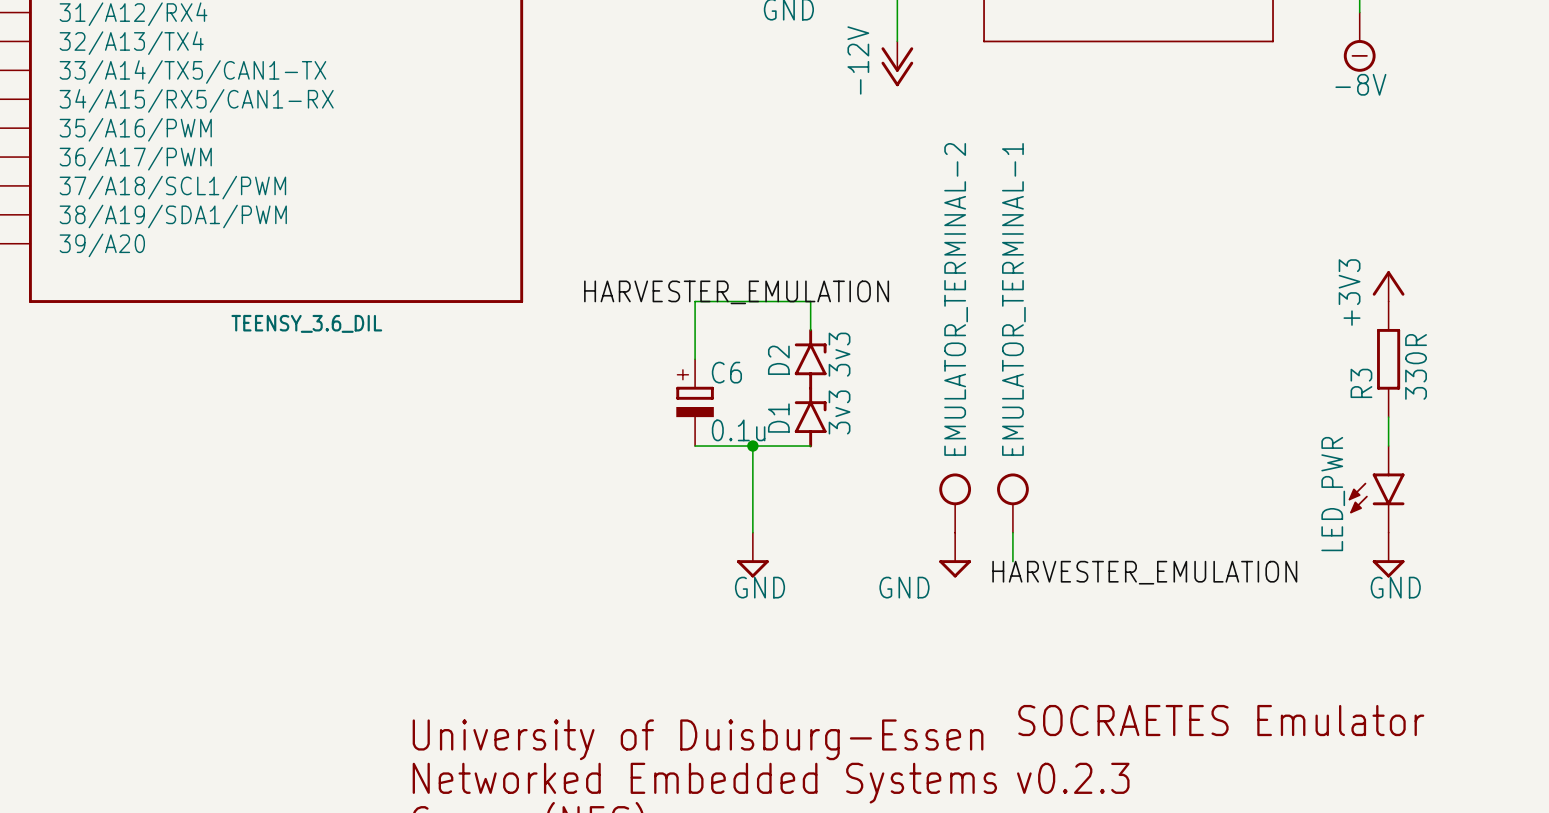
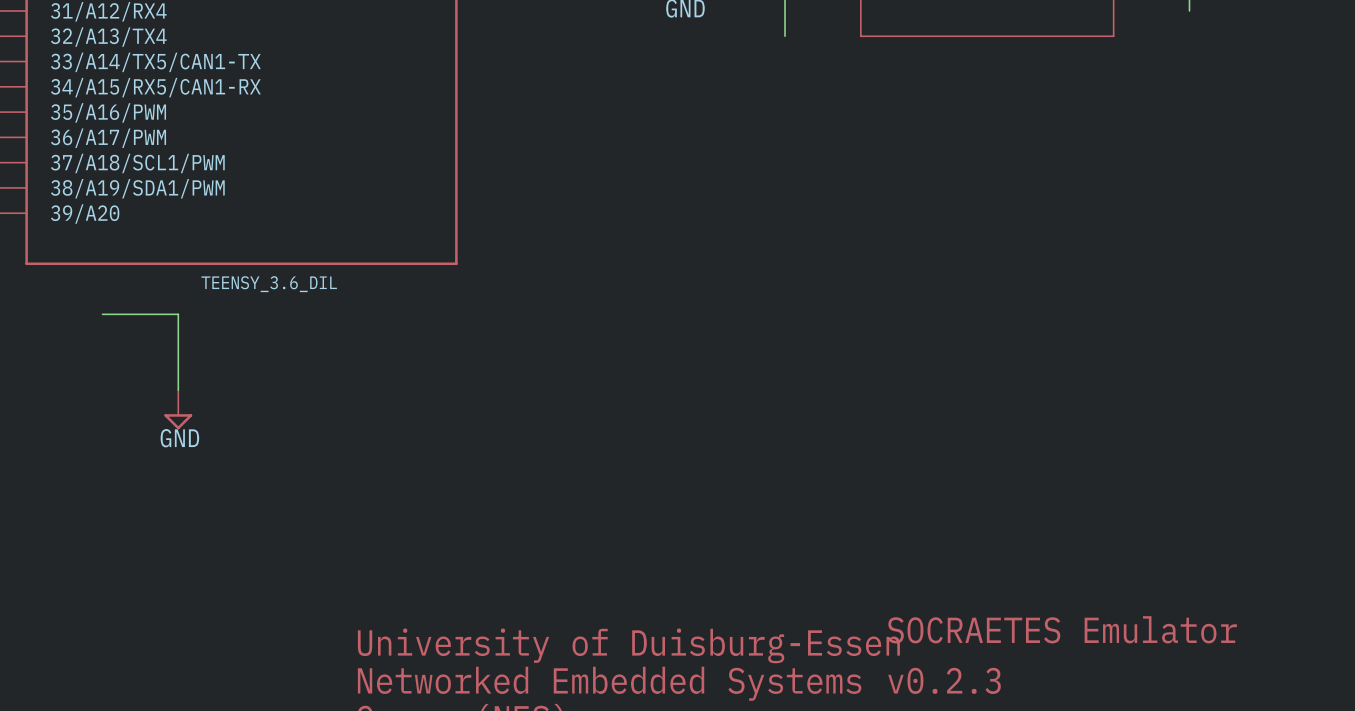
power symbol: -8V (1359, 42) -> none
power symbol: -12V (897, 63) -> none
power symbol: +3V3 (1388, 286) -> none
label: HARVESTER_EMULATION (736, 292) -> none
wire: (810, 330) (810, 301) (695, 301) (695, 359) -> none
wire: none -> (102, 314) (178, 314) (178, 390)
D2: 3v3 (810, 359) -> none
R3: 330R (1388, 359) -> none
C6: 0.1u (695, 402) -> none
D1: 3v3 (810, 417) -> none
wire: (1388, 417) (1388, 446) -> none
wire: (695, 446) (810, 446) -> none
wire: (752, 446) (752, 532) -> none
junction: (752, 446) -> none
power symbol: none -> GND (178, 409)
LED_PWR: (1376, 489) -> none
EMULATOR_TERMINAL-2: (955, 503) -> none
EMULATOR_TERMINAL-1: (1012, 503) -> none
wire: (1012, 532) (1012, 561) -> none
power symbol: GND (752, 555) -> none
power symbol: GND (955, 555) -> none
power symbol: GND (1388, 555) -> none
label: HARVESTER_EMULATION (1144, 572) -> none

